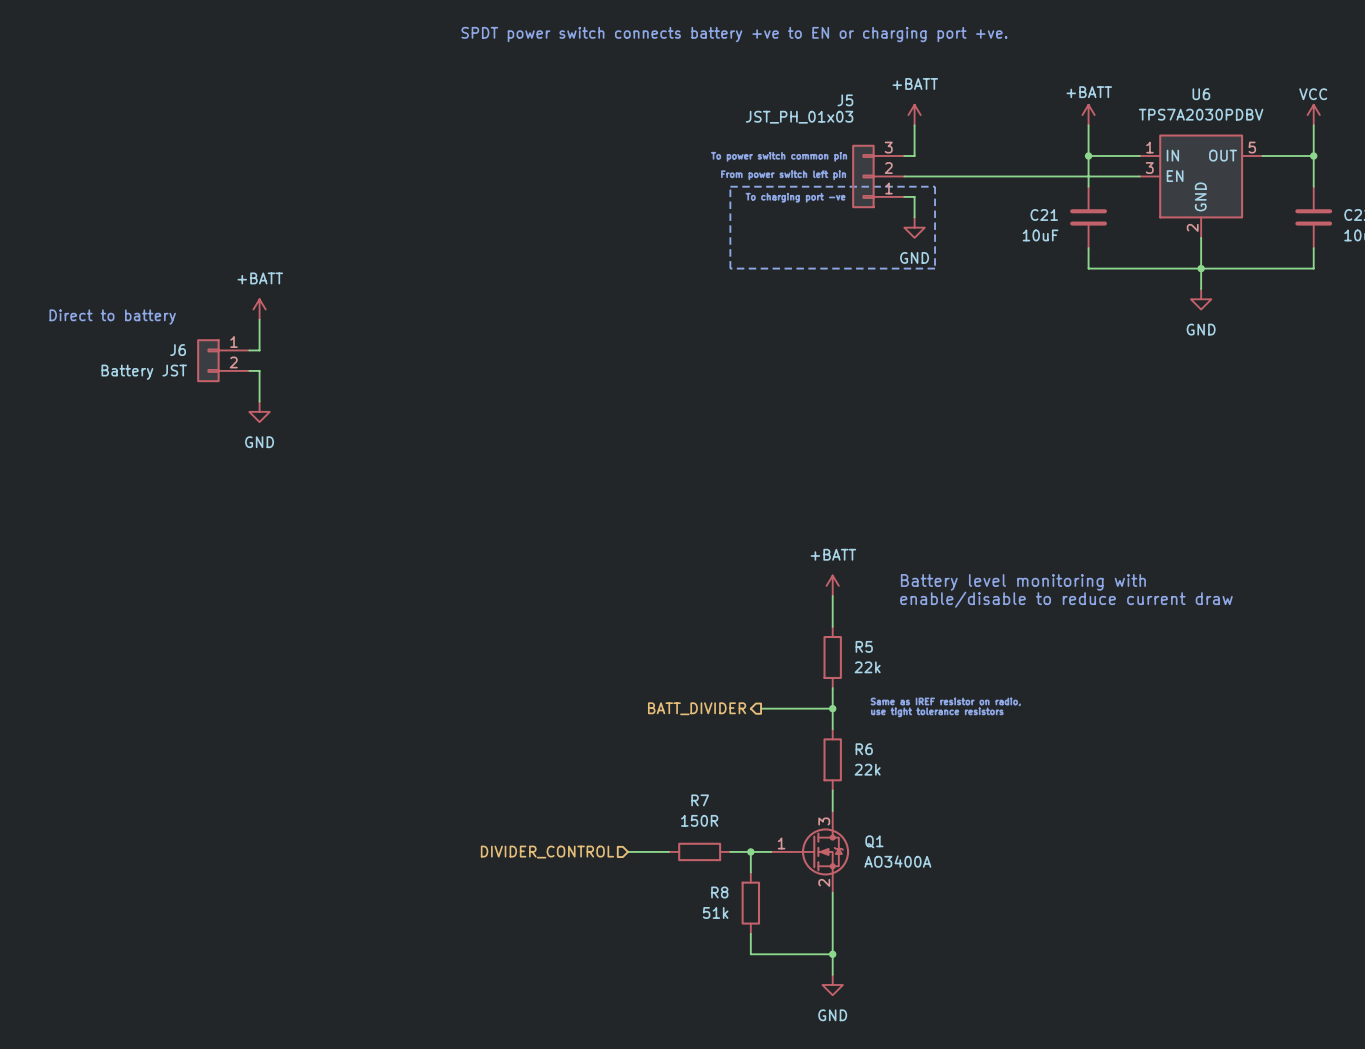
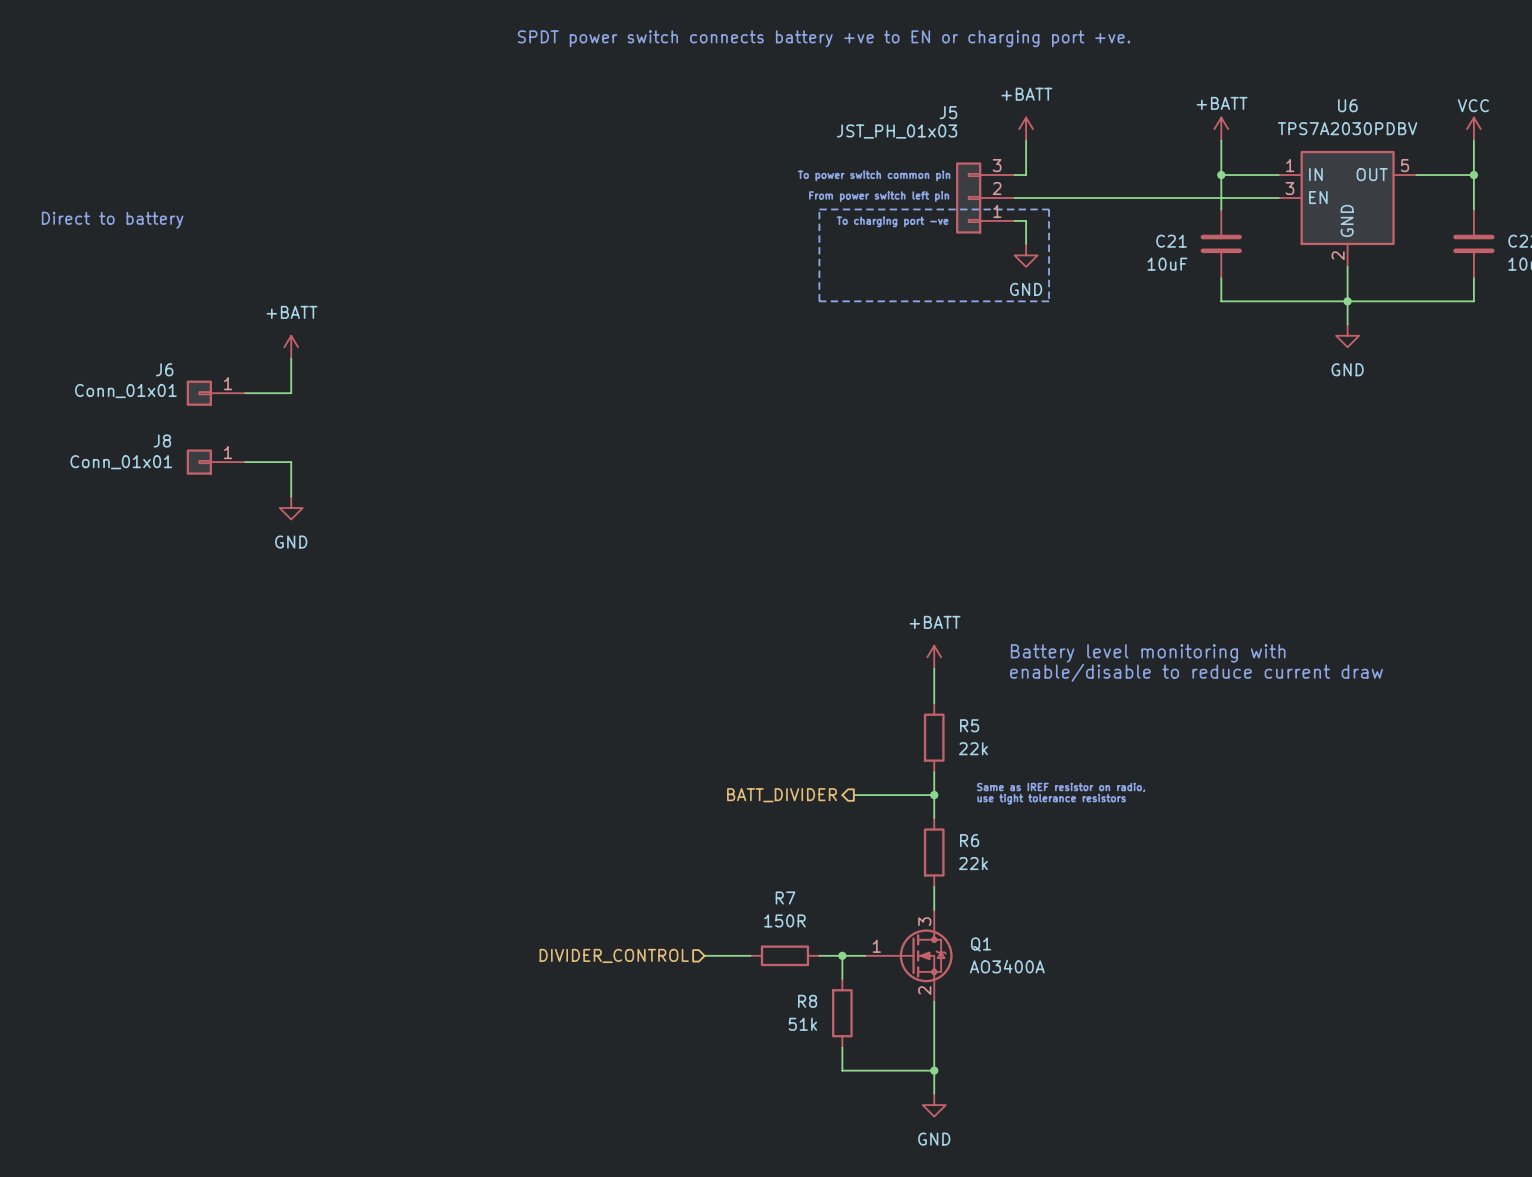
text position: Direct to battery (112, 317) -> Direct to battery (112, 220)
J6 symbol: [197, 339, 250, 383] -> [186, 380, 246, 406]
wire: (249, 370) (259, 370) (259, 401) -> none
J6 value: Battery JST (144, 372) -> Conn_01x01 (125, 391)
J8: none -> Conn_01x01 (216, 462)
wire: none -> (245, 462) (291, 462) (291, 496)
power symbol position: GND (259, 411) -> GND (291, 508)

